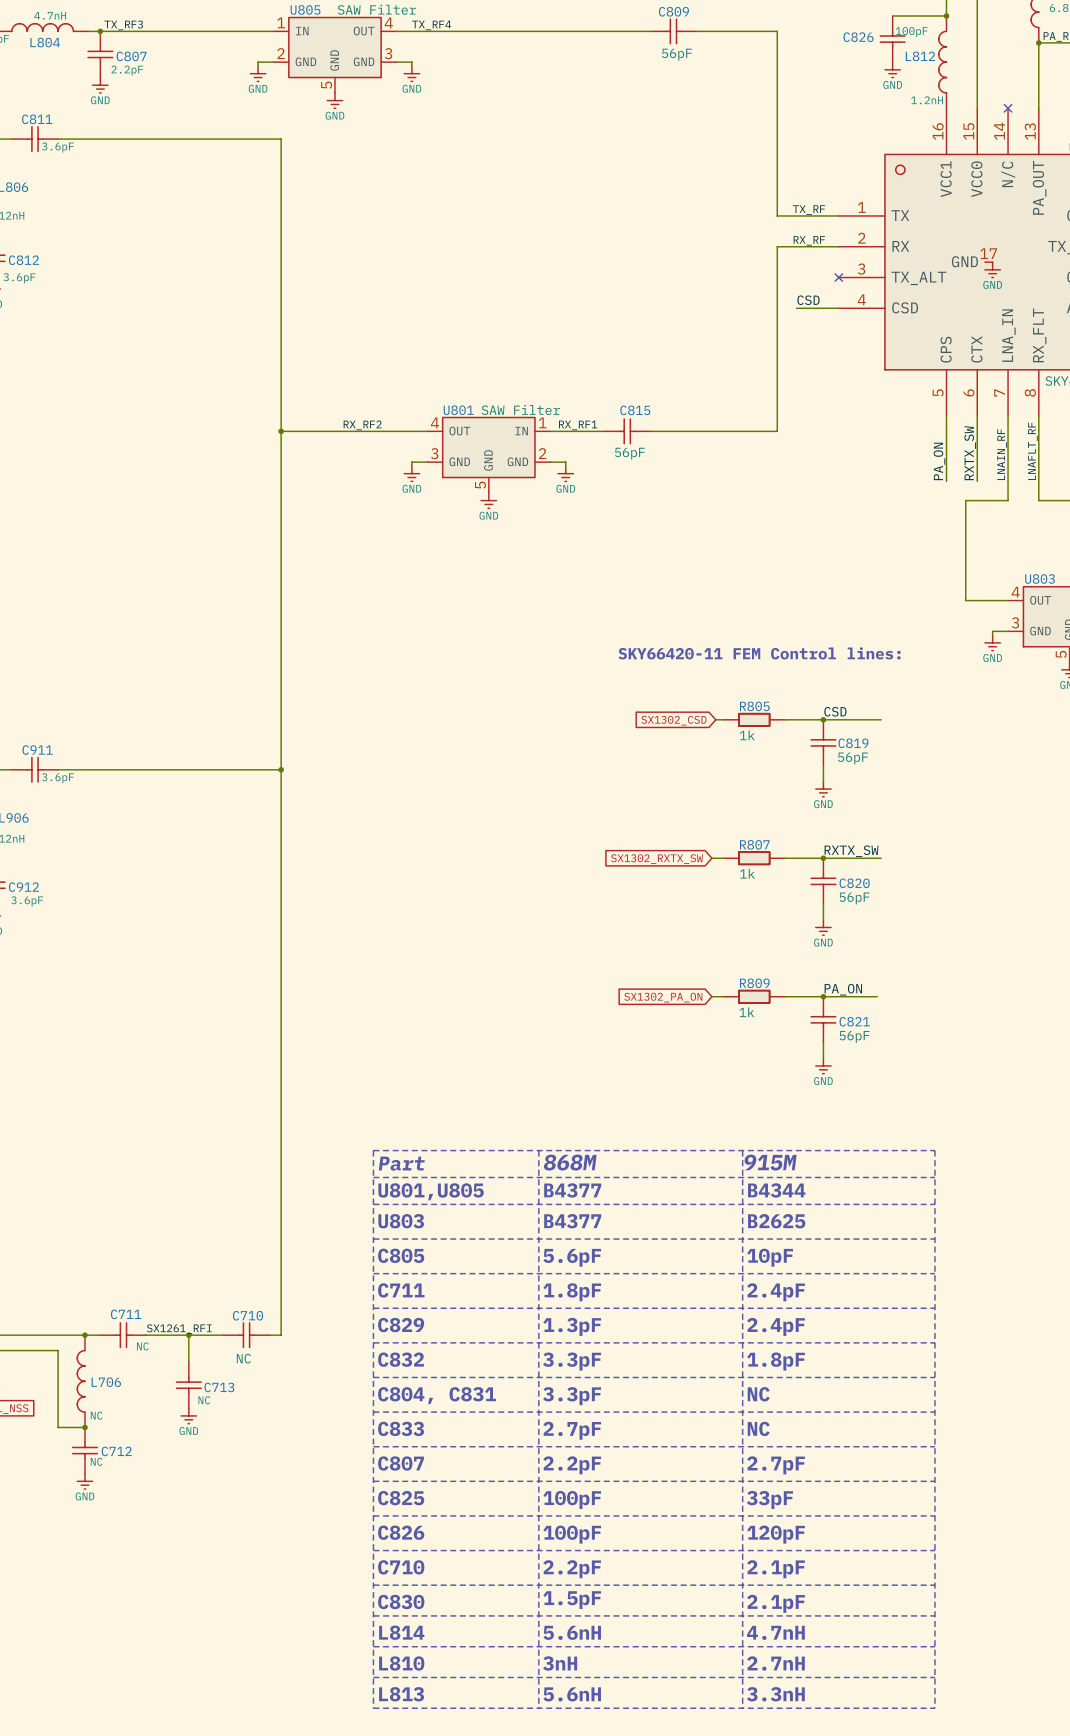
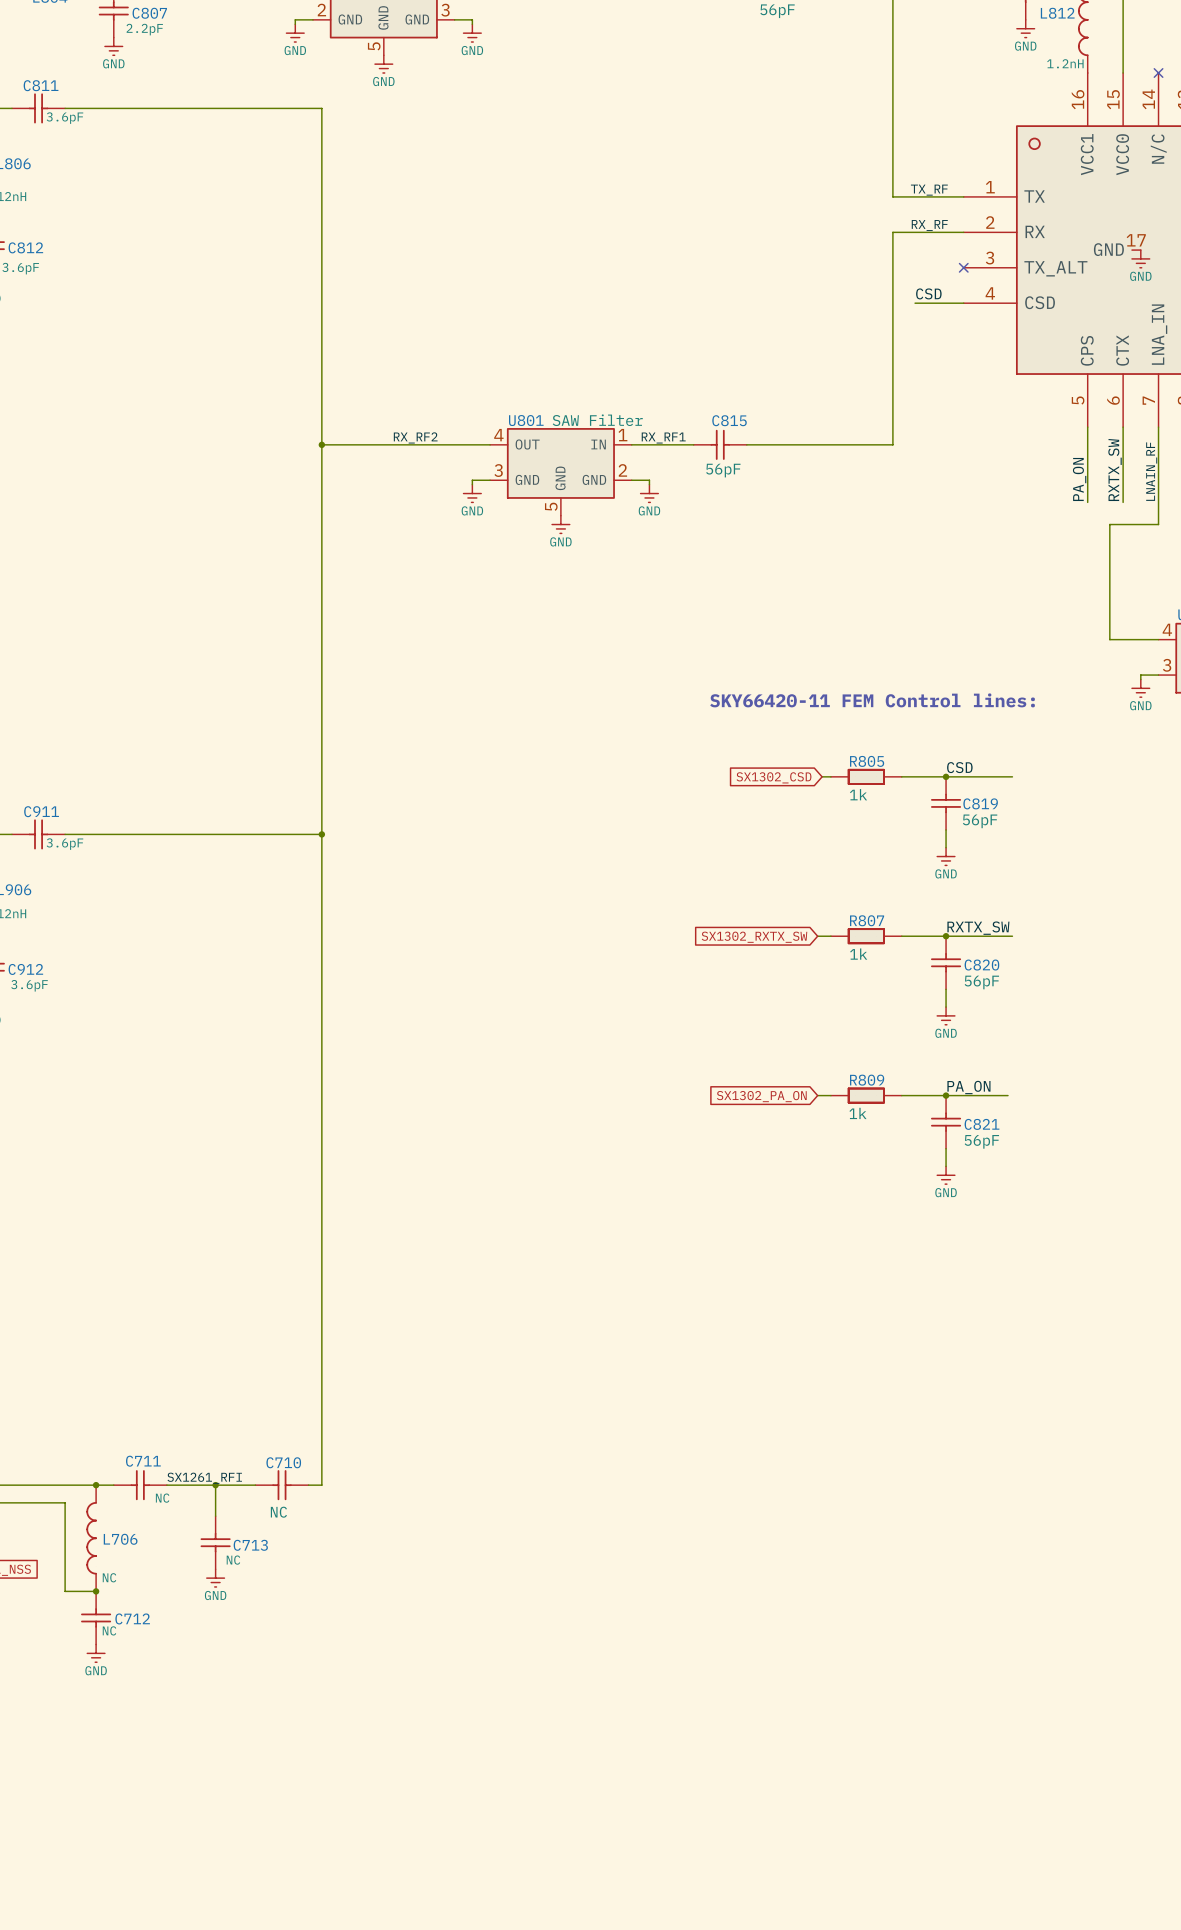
line: (373, 1150) (934, 1150) (934, 1708) (373, 1708) (373, 1150) -> none
line: (538, 1150) (538, 1708) -> none
line: (742, 1150) (742, 1708) -> none
text: 868M (570, 1162) -> none
text: 915M (770, 1162) -> none
text: Part (401, 1163) -> none
line: (373, 1177) (934, 1177) -> none
text: B4377 (572, 1190) -> none
text: B4344 (776, 1190) -> none
text: U801,U805 (431, 1191) -> none
line: (373, 1204) (934, 1204) -> none
text: U803 (401, 1221) -> none
text: B4377 (572, 1221) -> none
text: B2625 (776, 1221) -> none
line: (373, 1239) (934, 1239) -> none
text: C805 (401, 1255) -> none
text: 5.6pF (572, 1257) -> none
text: 10pF (770, 1257) -> none
line: (373, 1273) (934, 1273) -> none
text: C711 (401, 1290) -> none
text: 1.8pF (572, 1292) -> none
text: 2.4pF (776, 1292) -> none
line: (373, 1308) (934, 1308) -> none
text: C829 (401, 1325) -> none
text: 1.3pF (572, 1326) -> none
text: 2.4pF (776, 1326) -> none
line: (373, 1342) (934, 1342) -> none
text: C832 (401, 1359) -> none
text: 3.3pF (572, 1361) -> none
text: 1.8pF (776, 1361) -> none
line: (373, 1377) (934, 1377) -> none
text: NC (758, 1394) -> none
text: C804, C831 (437, 1395) -> none
text: 3.3pF (572, 1396) -> none
line: (373, 1412) (934, 1412) -> none
text: C833 (401, 1428) -> none
text: NC (758, 1428) -> none
text: 2.7pF (572, 1430) -> none
line: (373, 1446) (934, 1446) -> none
text: C807 (401, 1463) -> none
text: 2.2pF (572, 1465) -> none
text: 2.7pF (776, 1465) -> none
line: (373, 1481) (934, 1481) -> none
text: C825 (401, 1498) -> none
text: 100pF (572, 1499) -> none
text: 33pF (769, 1499) -> none
line: (373, 1515) (934, 1515) -> none
text: C826 (401, 1532) -> none
text: 100pF (572, 1534) -> none
text: 120pF (776, 1534) -> none
line: (373, 1550) (934, 1550) -> none
text: C710 (401, 1567) -> none
text: 2.2pF (572, 1569) -> none
text: 2.1pF (776, 1569) -> none
line: (373, 1585) (934, 1585) -> none
text: 1.5pF (572, 1600) -> none
text: C830 (401, 1601) -> none
text: 2.1pF (776, 1603) -> none
line: (373, 1615) (934, 1615) -> none
text: L814 (401, 1632) -> none
text: 5.6nH (572, 1632) -> none
text: 4.7nH (775, 1632) -> none
line: (373, 1646) (934, 1646) -> none
text: L810 (401, 1663) -> none
text: 3nH (560, 1663) -> none
text: 2.7nH (776, 1663) -> none
line: (373, 1677) (934, 1677) -> none
text: L813 (401, 1694) -> none
text: 5.6nH (572, 1694) -> none
text: 3.3nH (775, 1694) -> none

